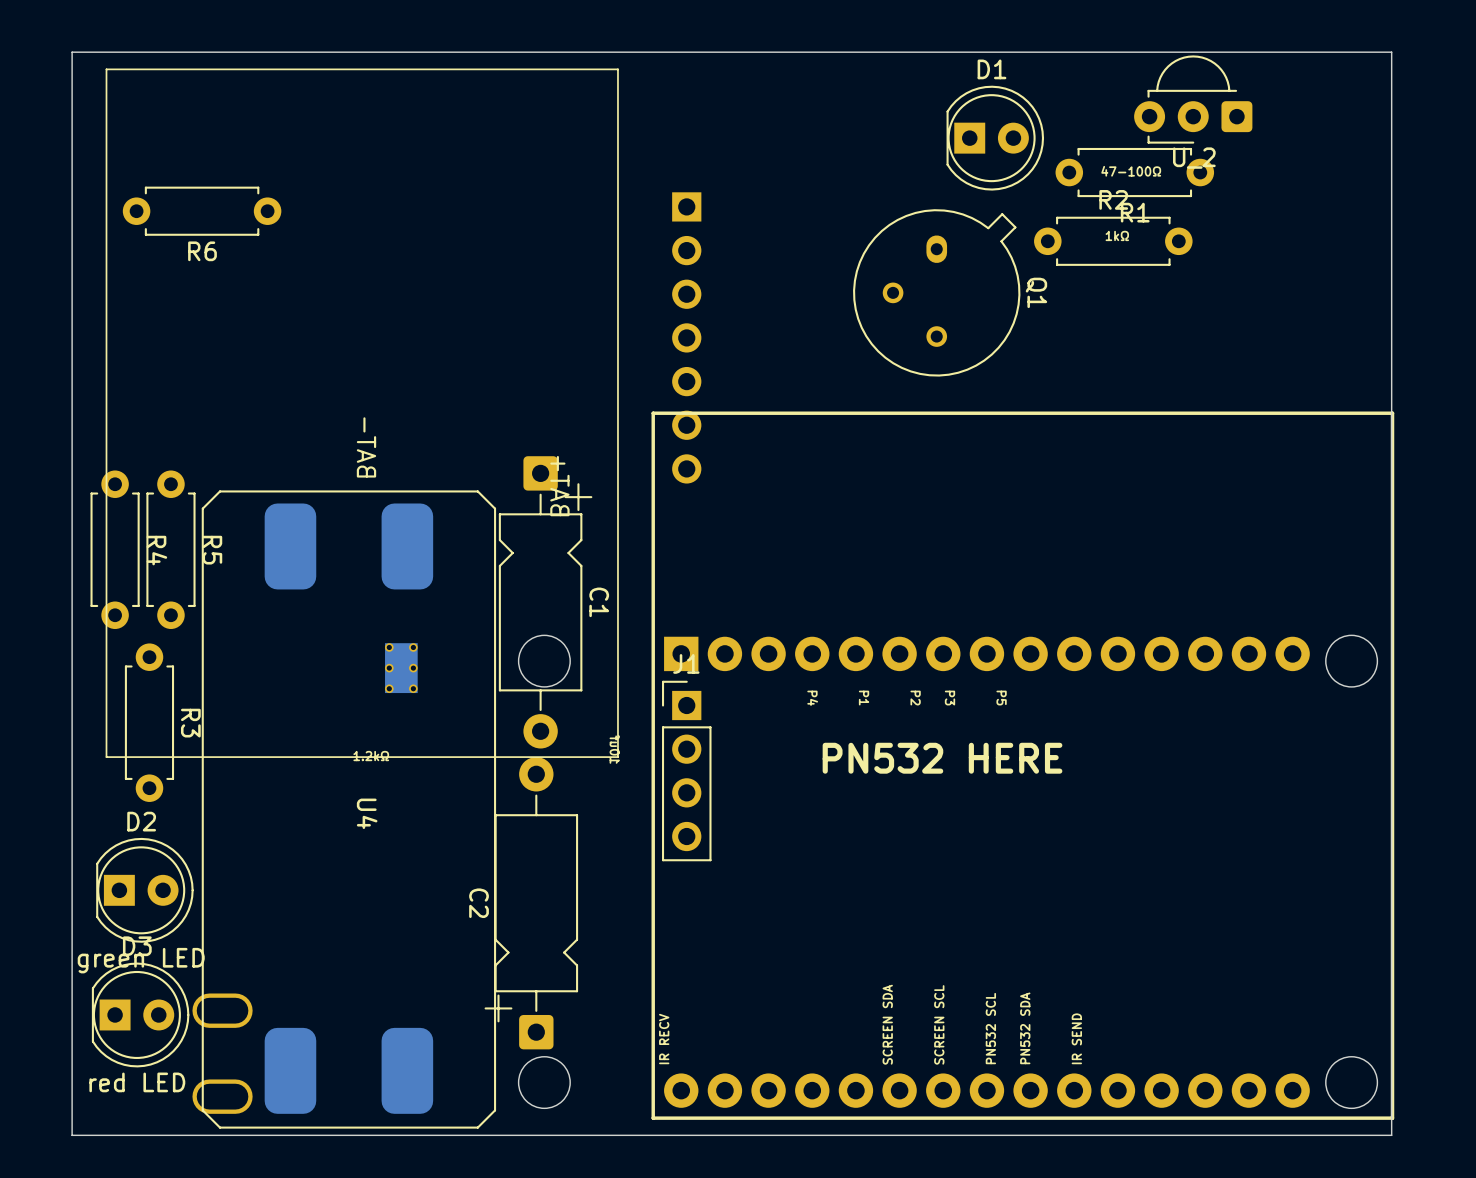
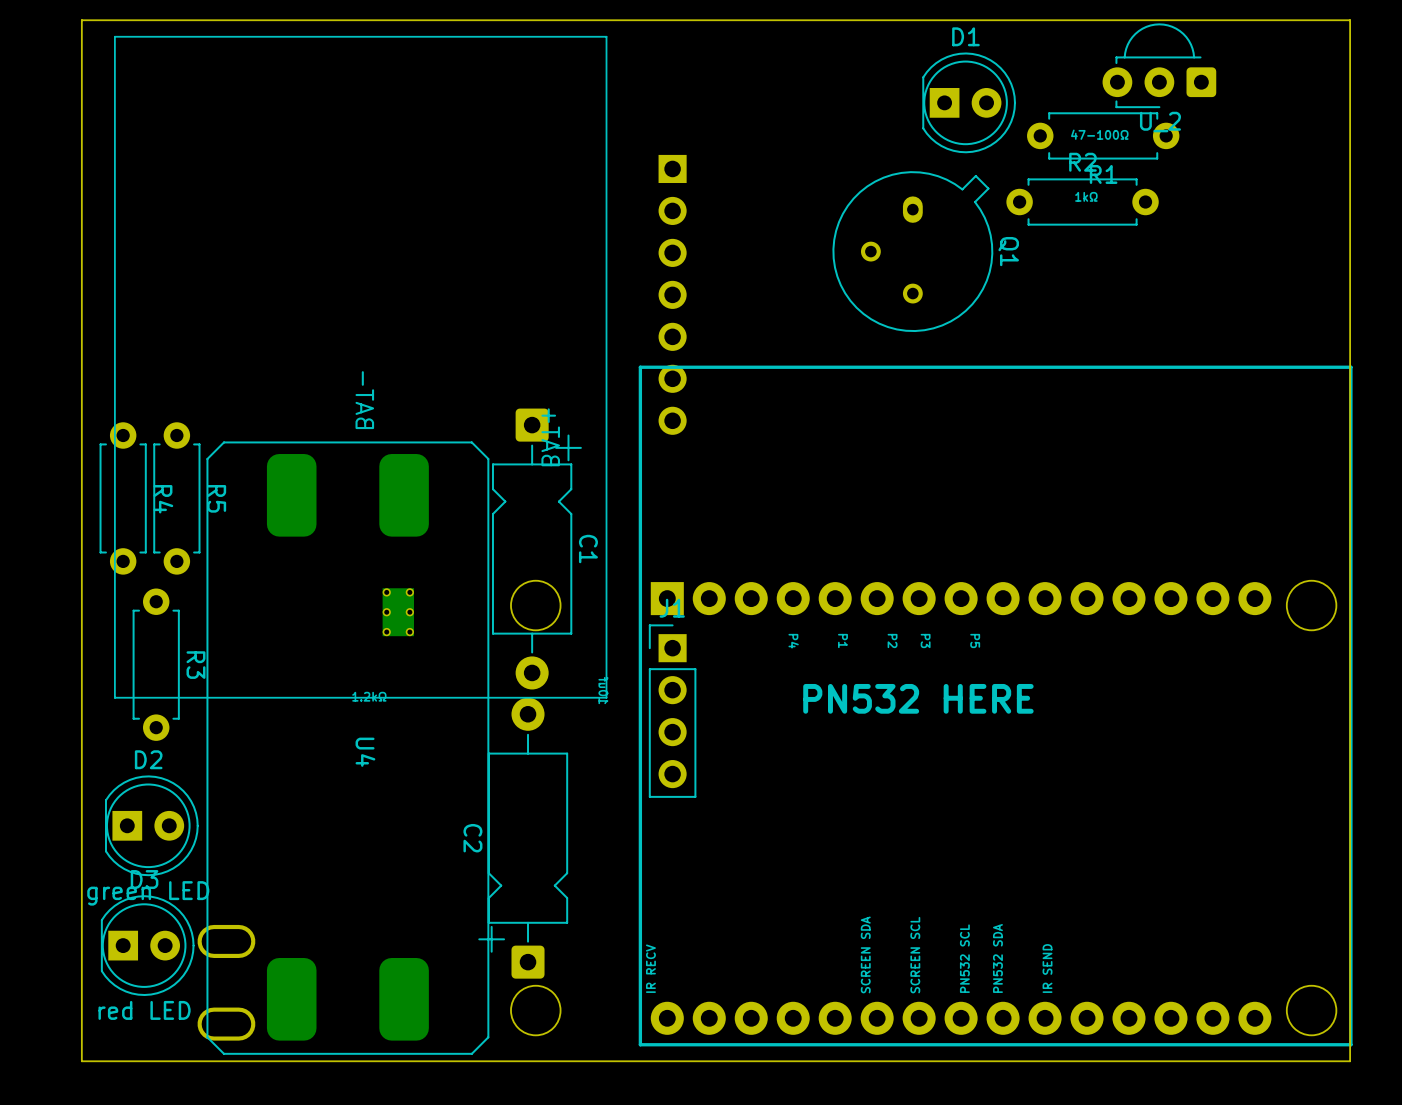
R6: (202, 211) -> none

